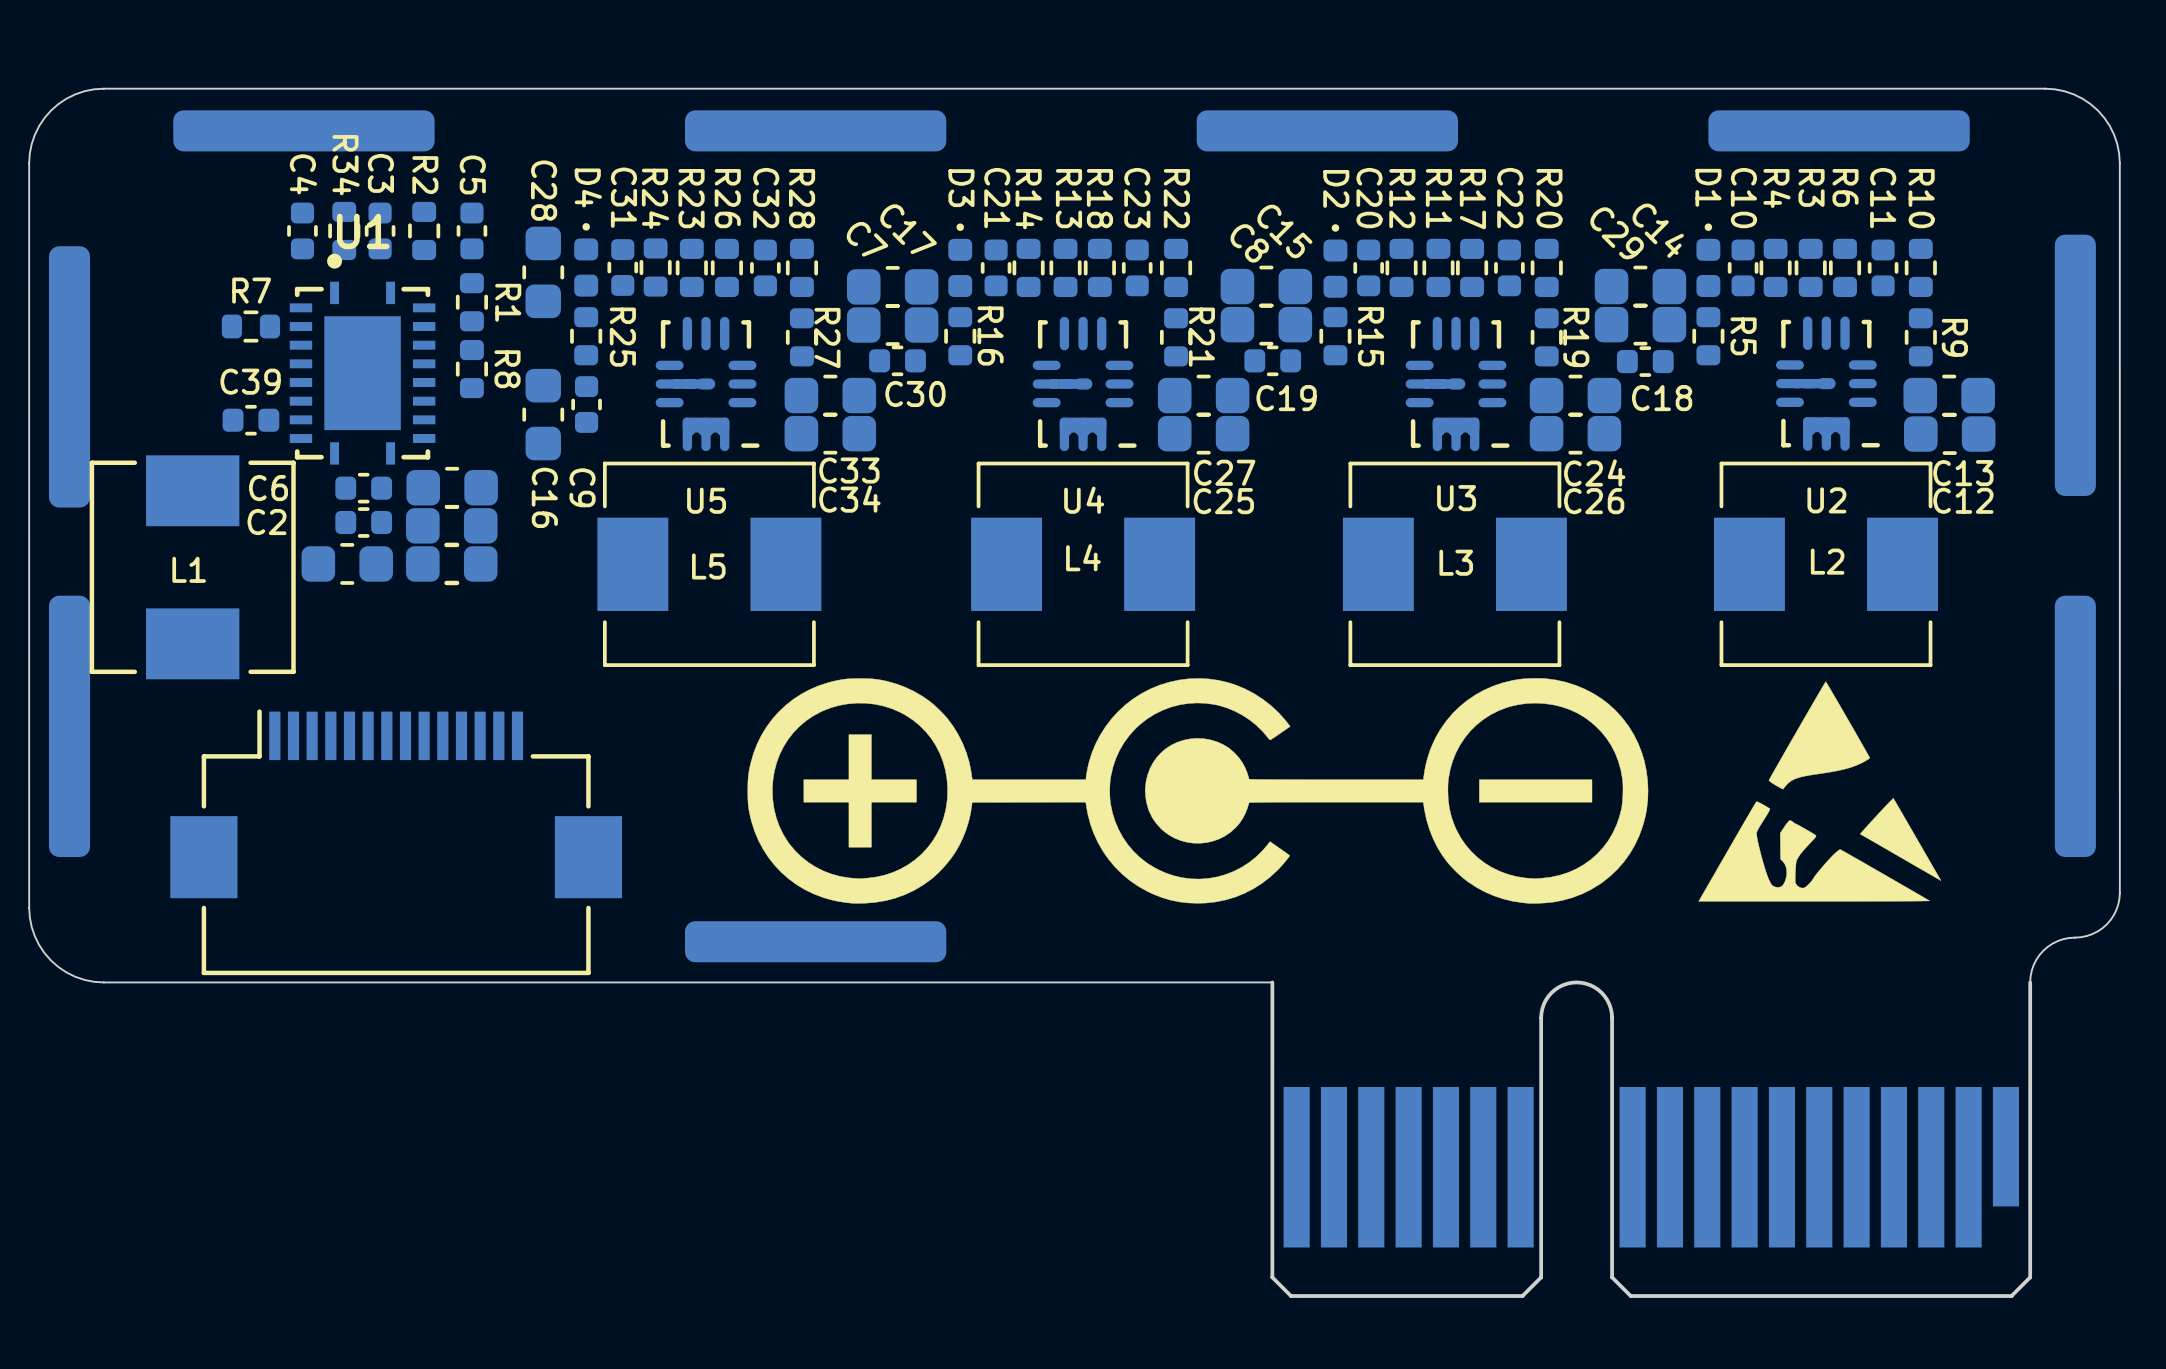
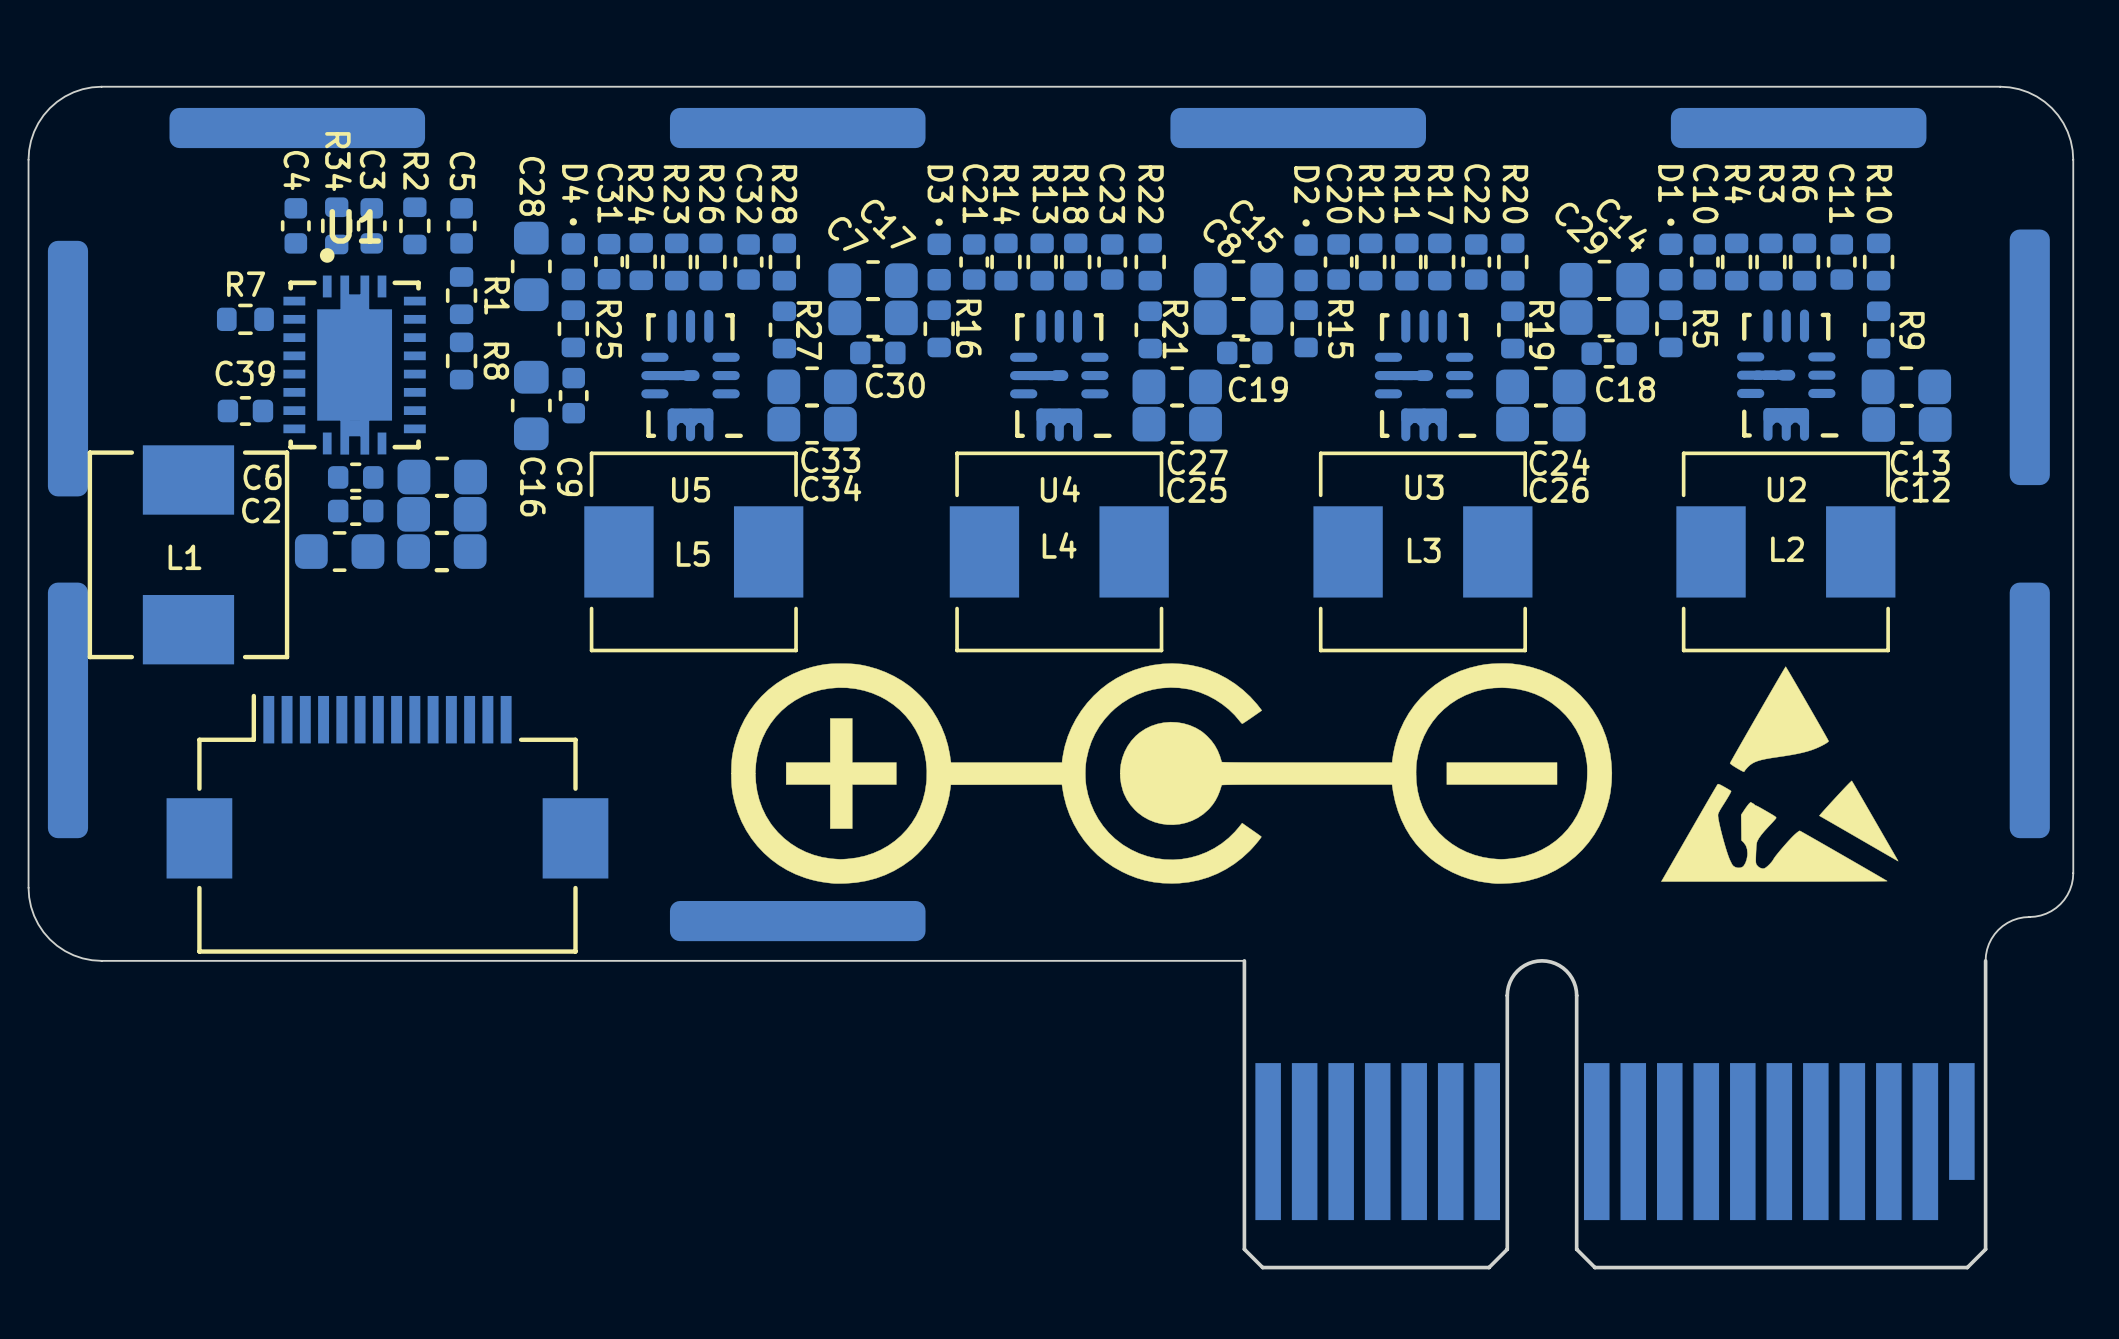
U1 footprint: [289, 253, 436, 465] -> [283, 248, 426, 455]

